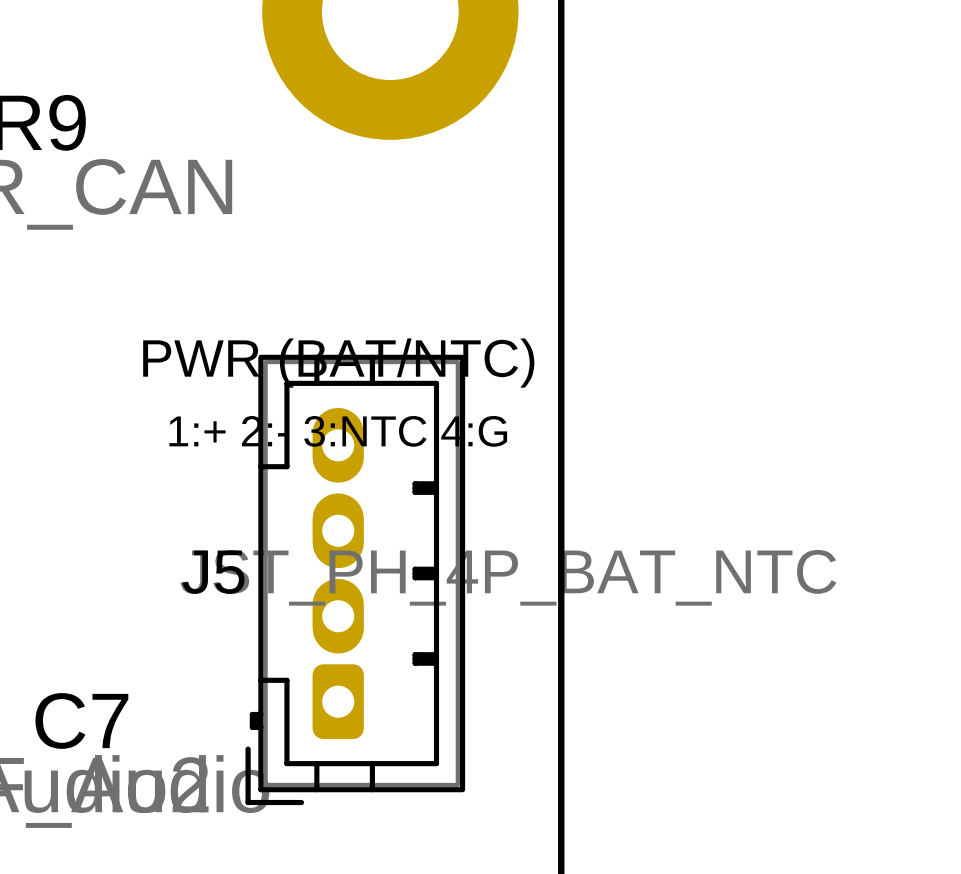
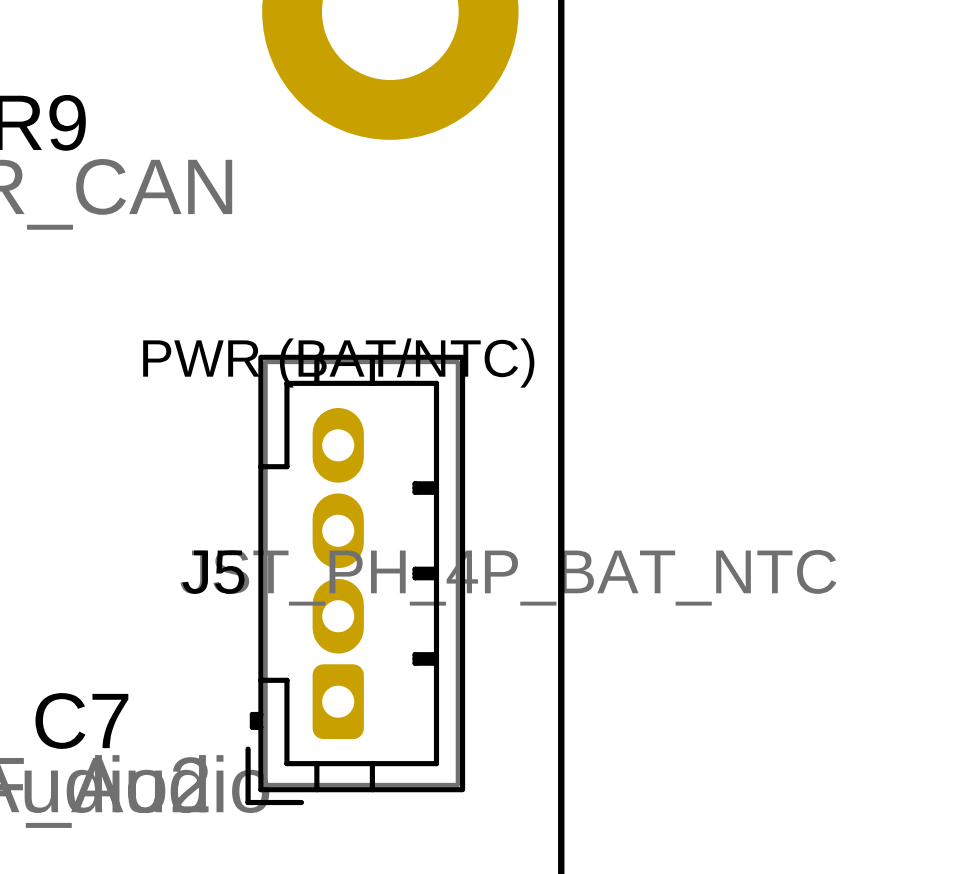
text: 1:+ 2:- 3:NTC 4:G (338, 431) -> none

